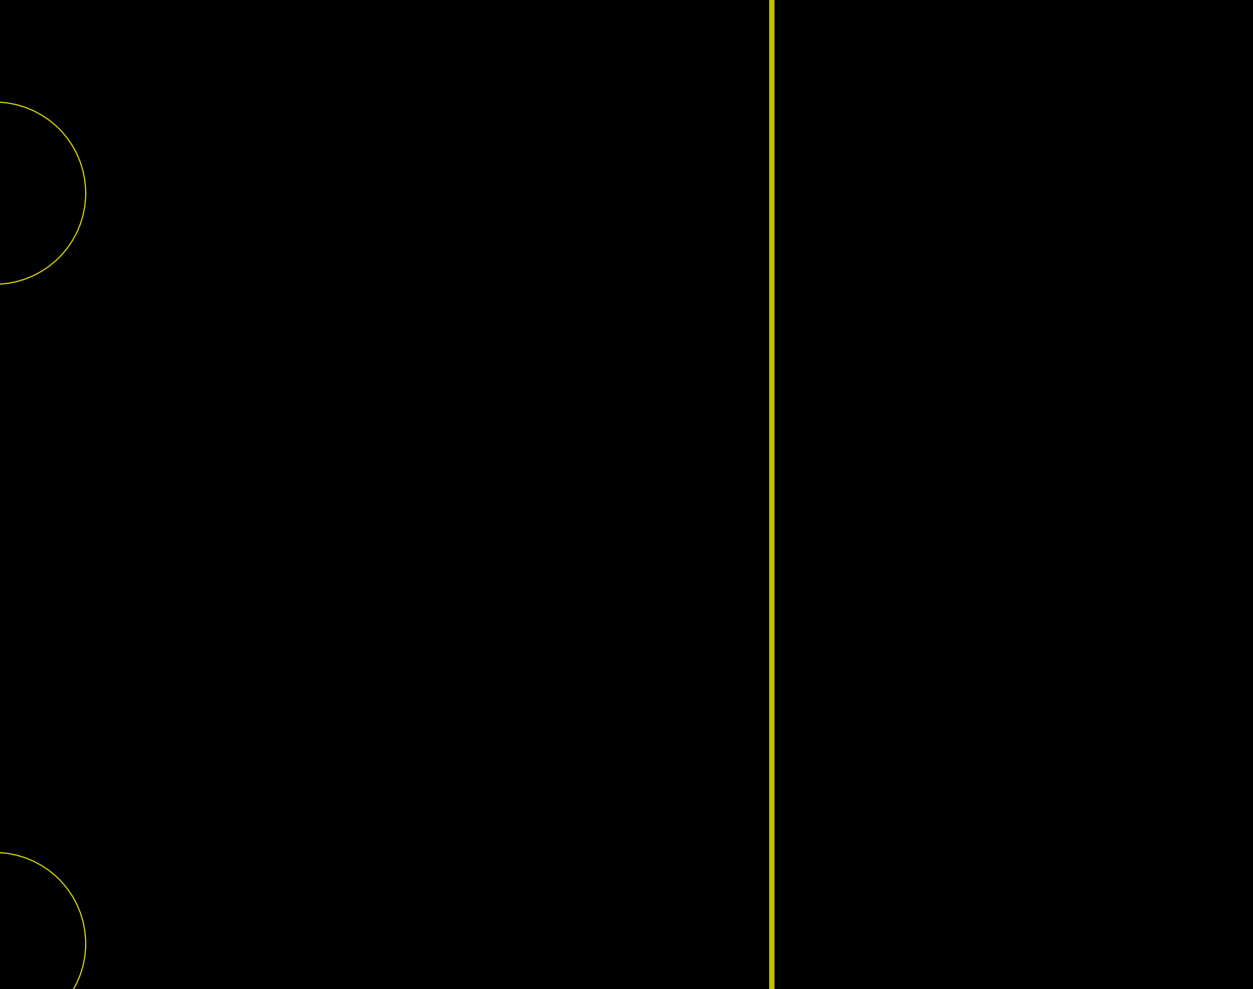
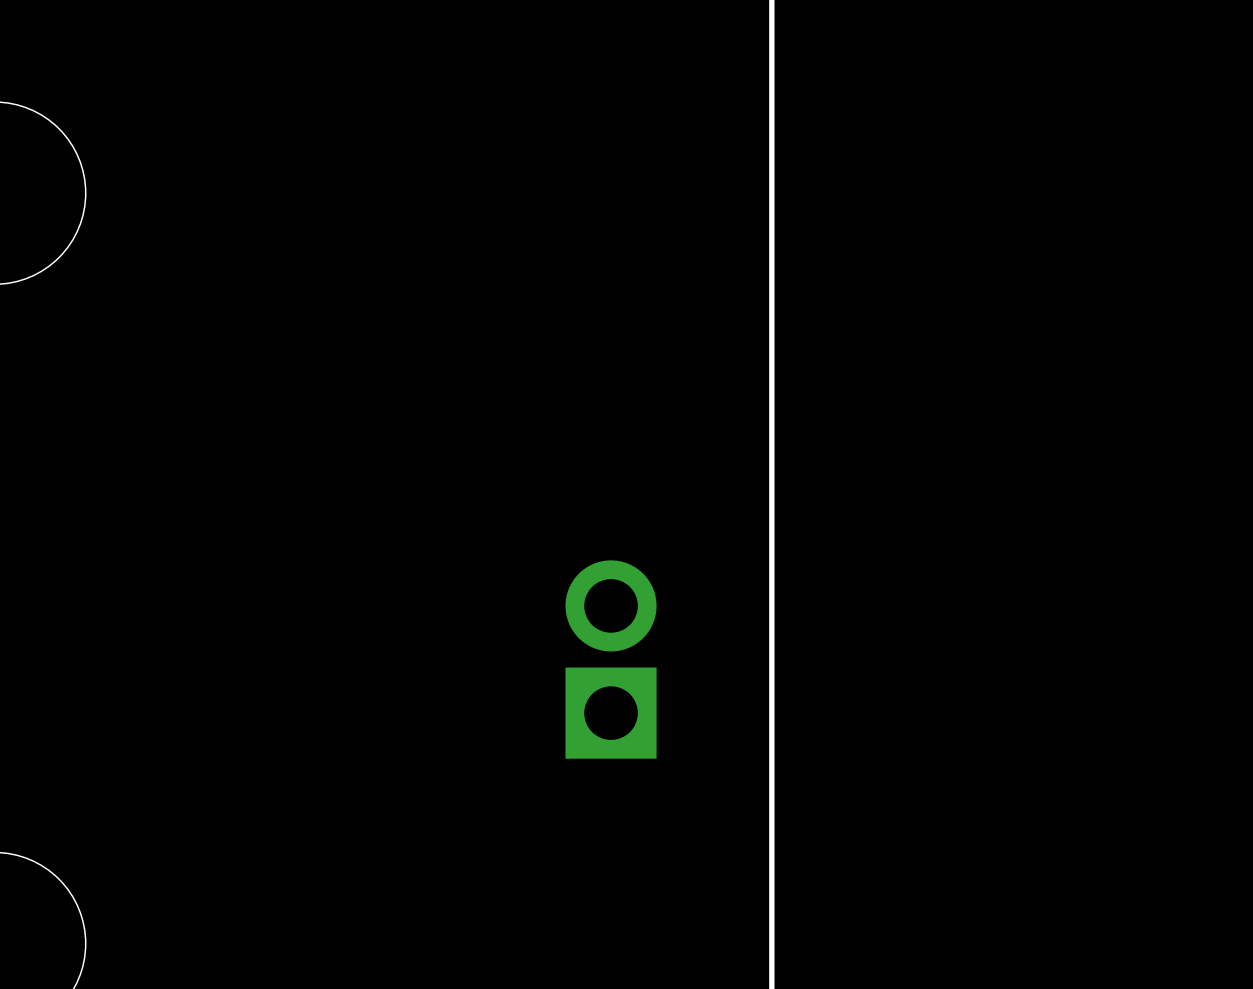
part: none -> (611, 659)

